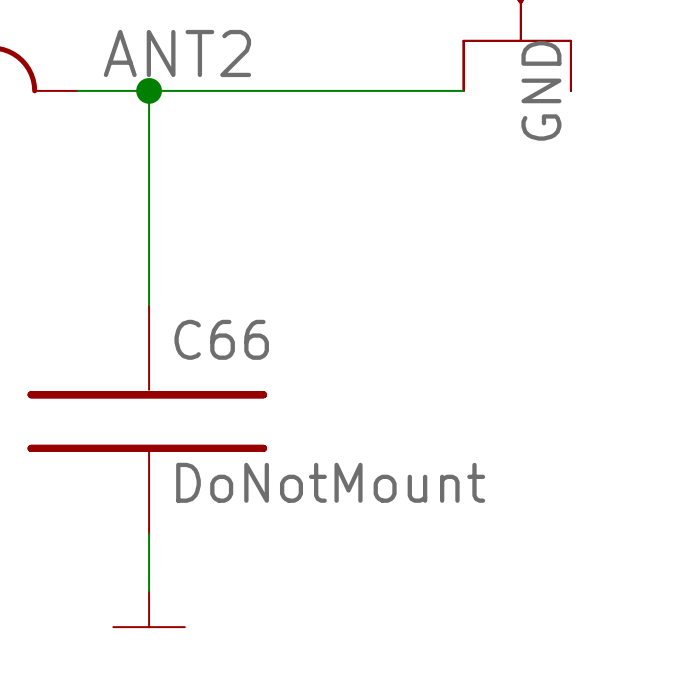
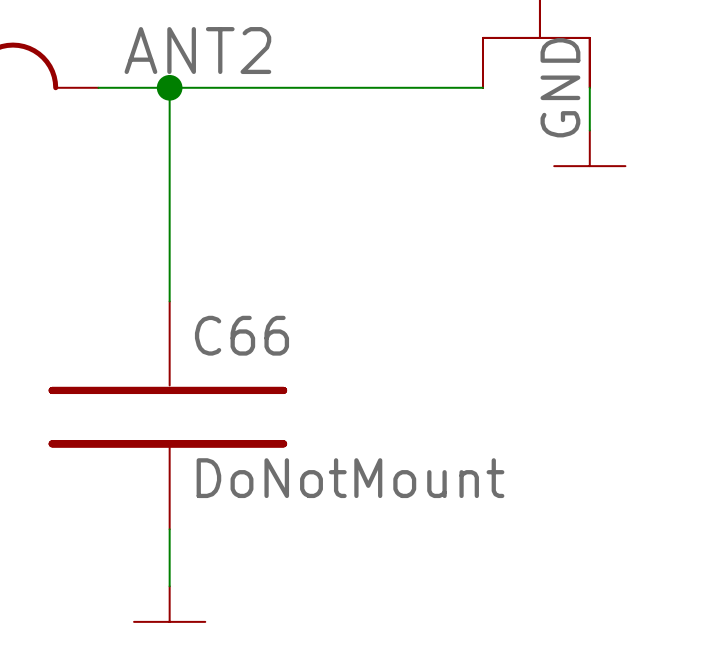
wire: none -> (589, 87) (589, 130)
power symbol: none -> (589, 148)

